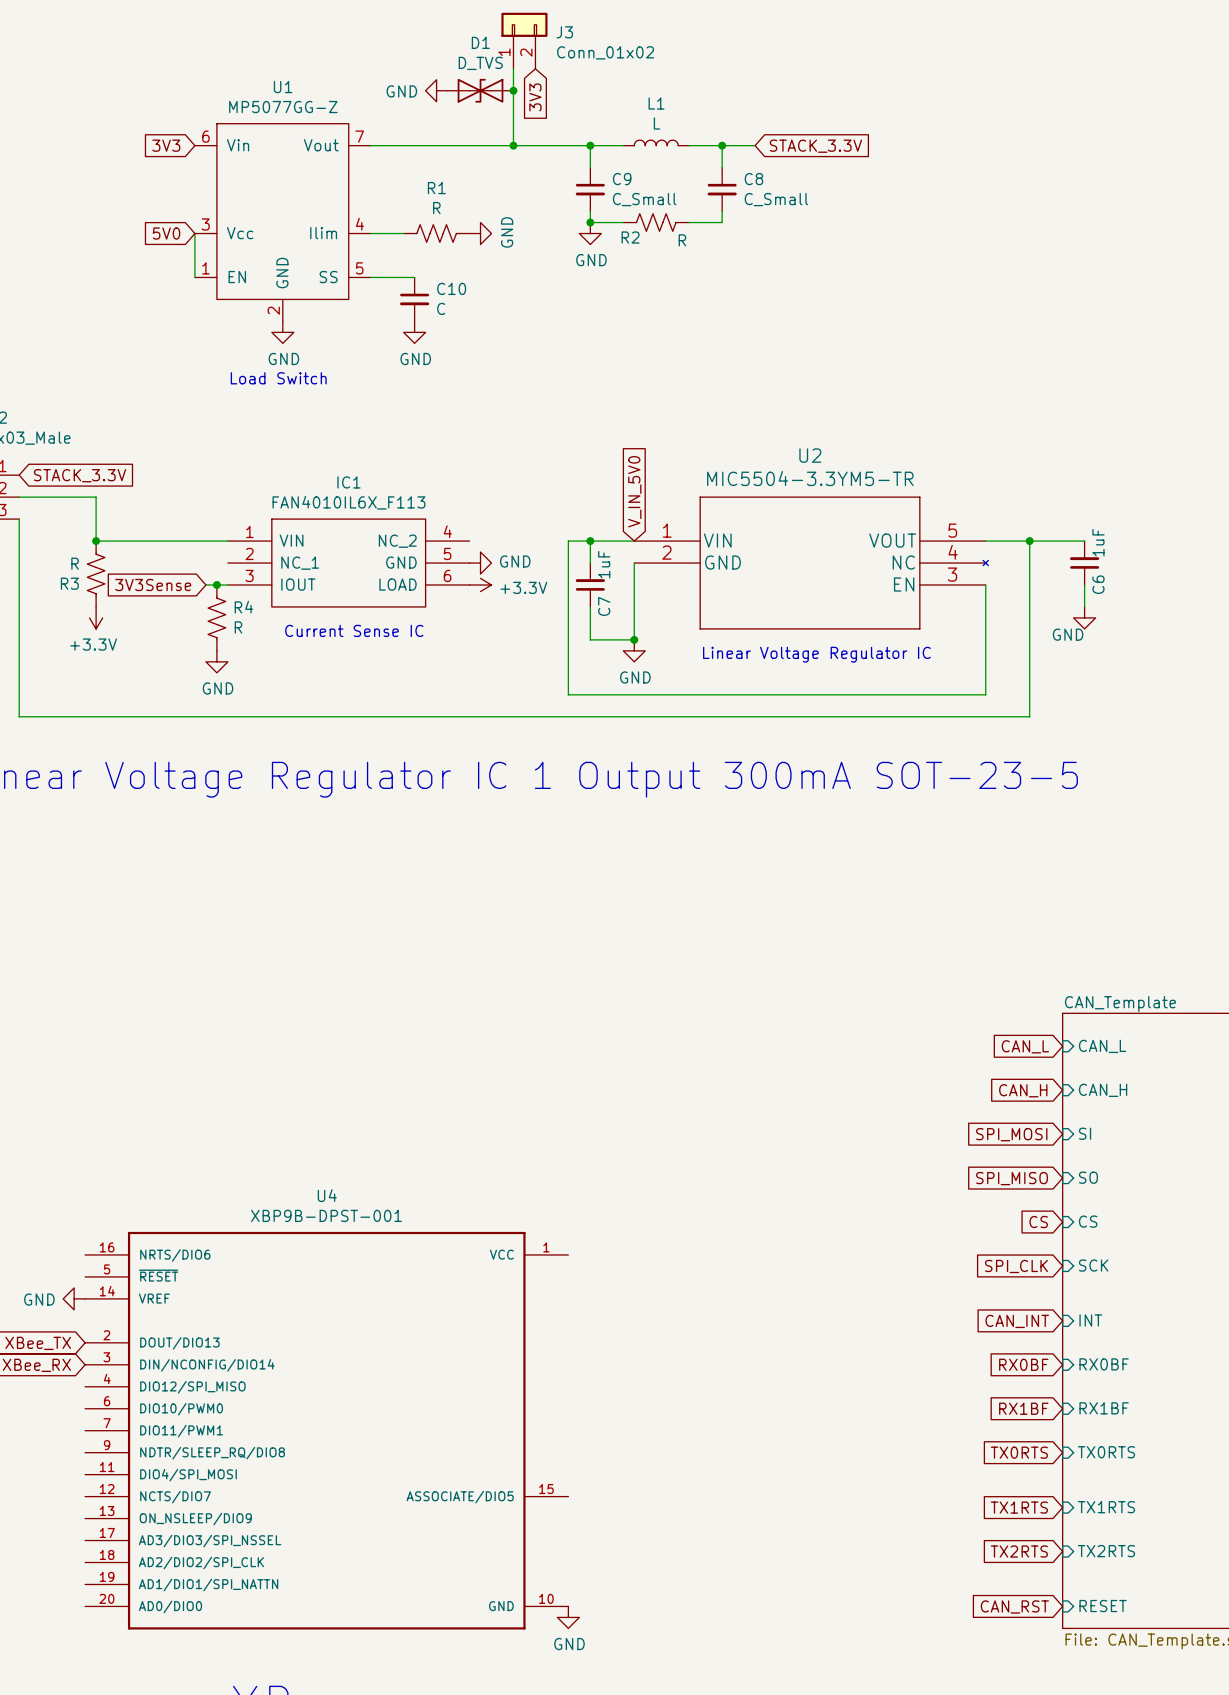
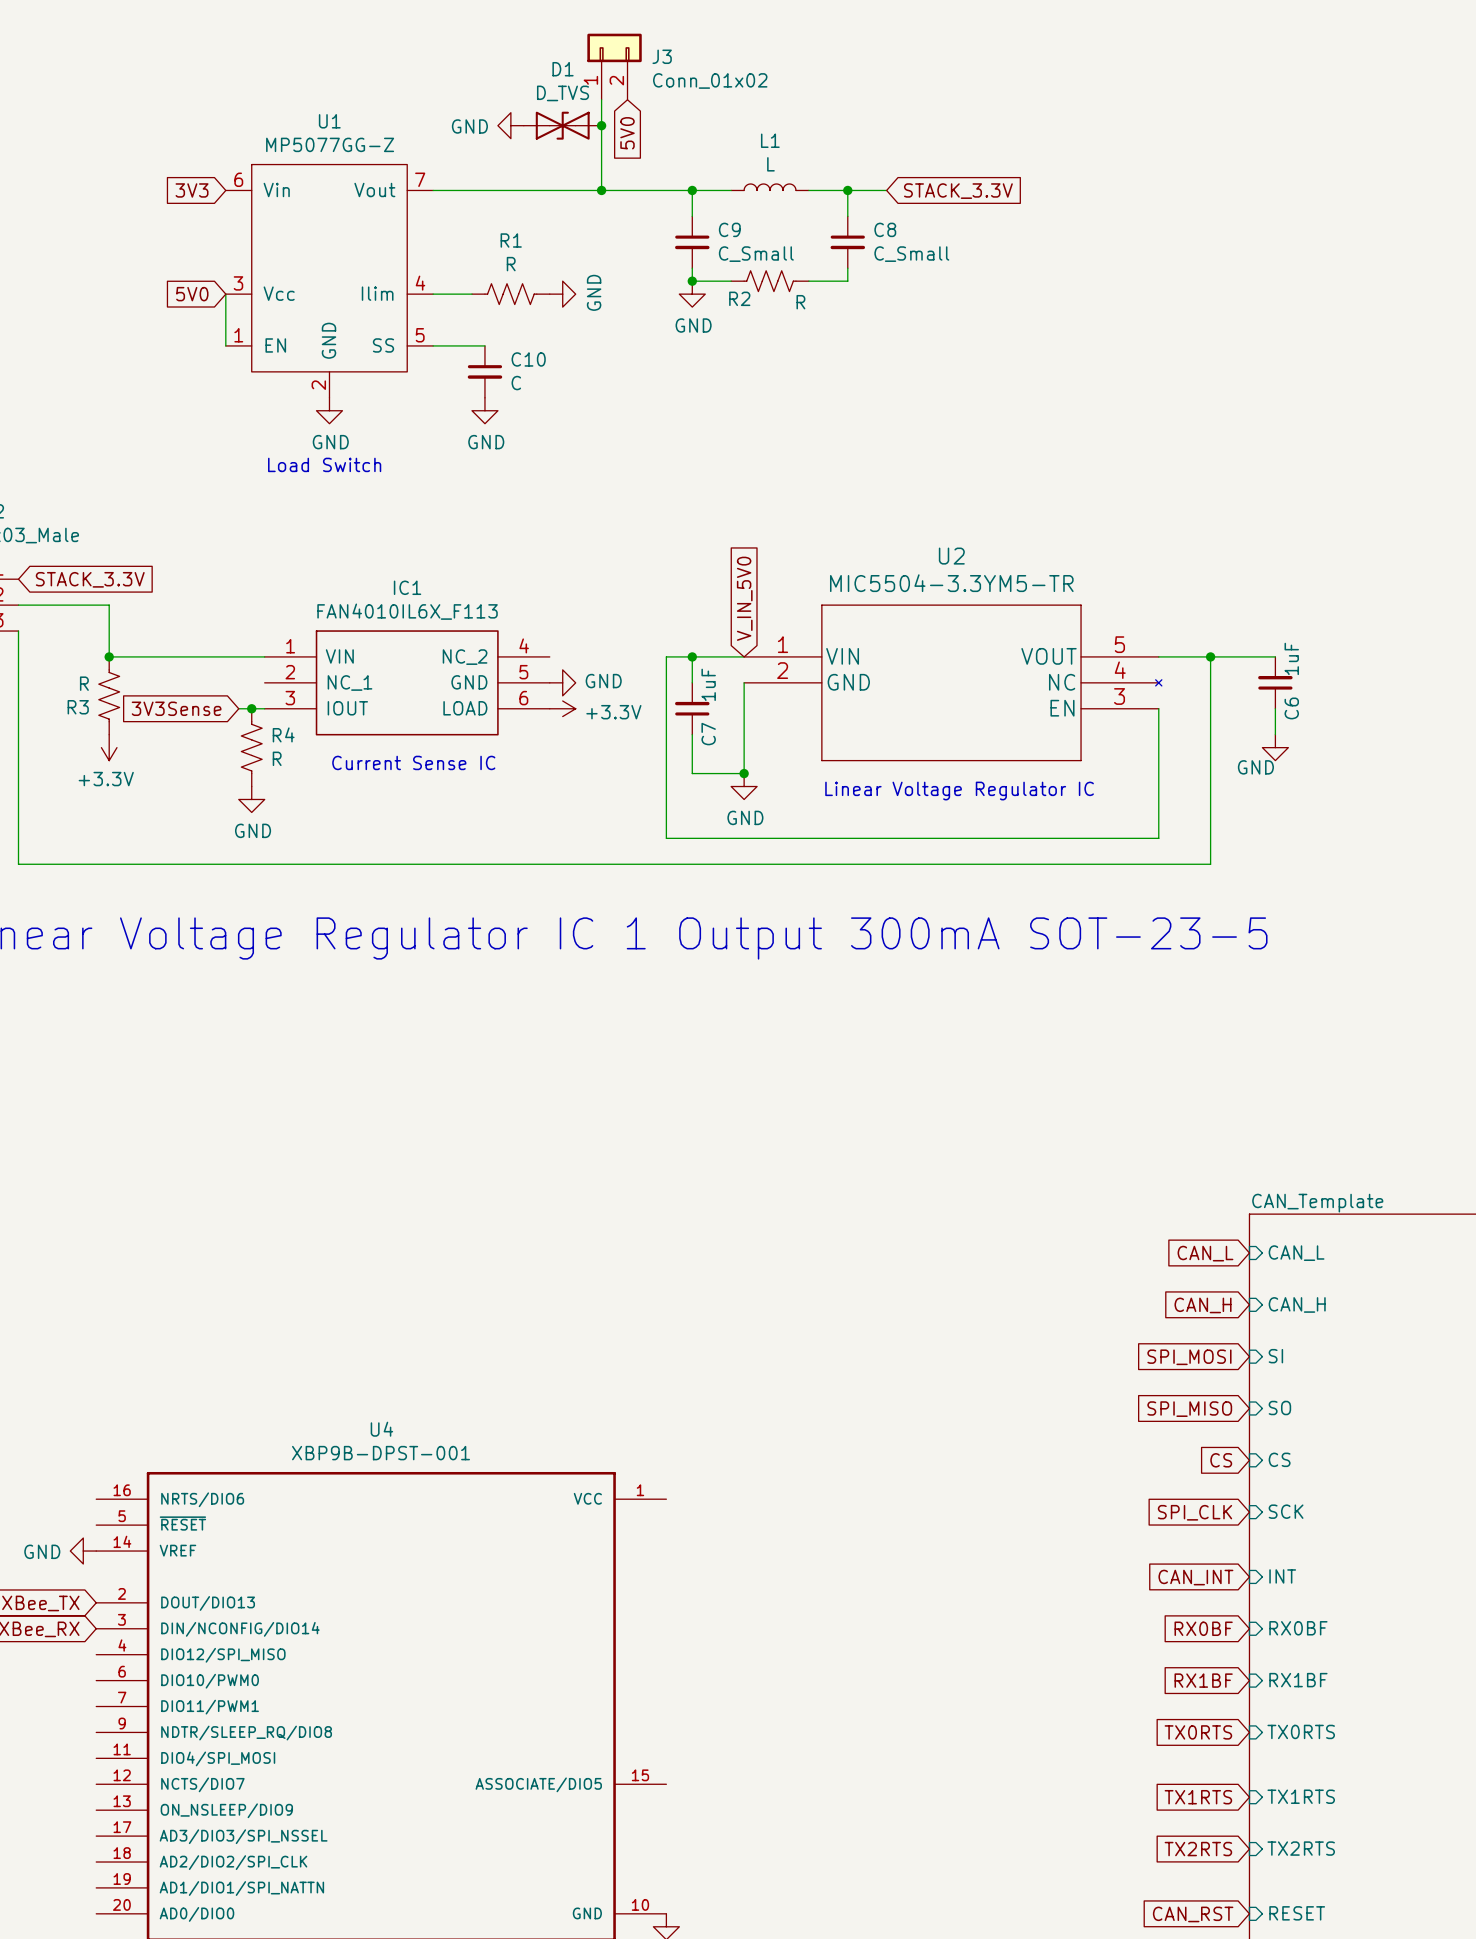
global label: 3V3 (535, 97) -> 5V0 (627, 133)

